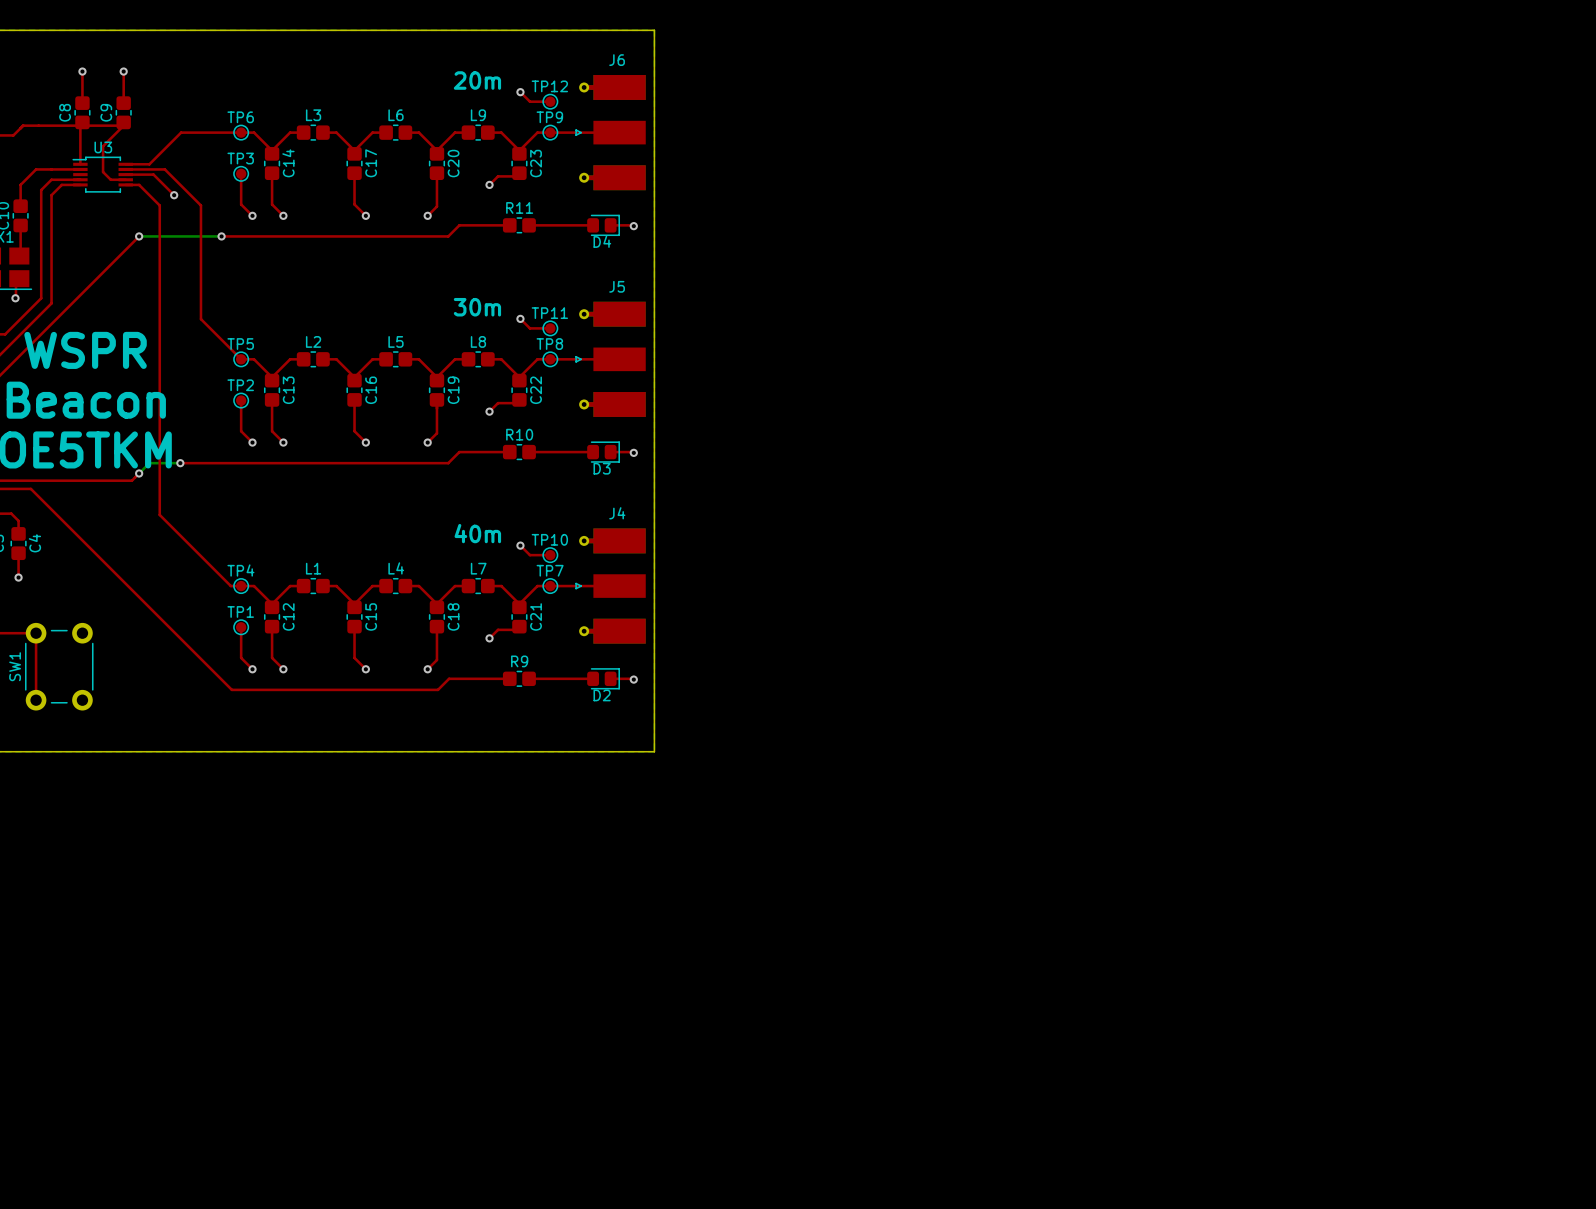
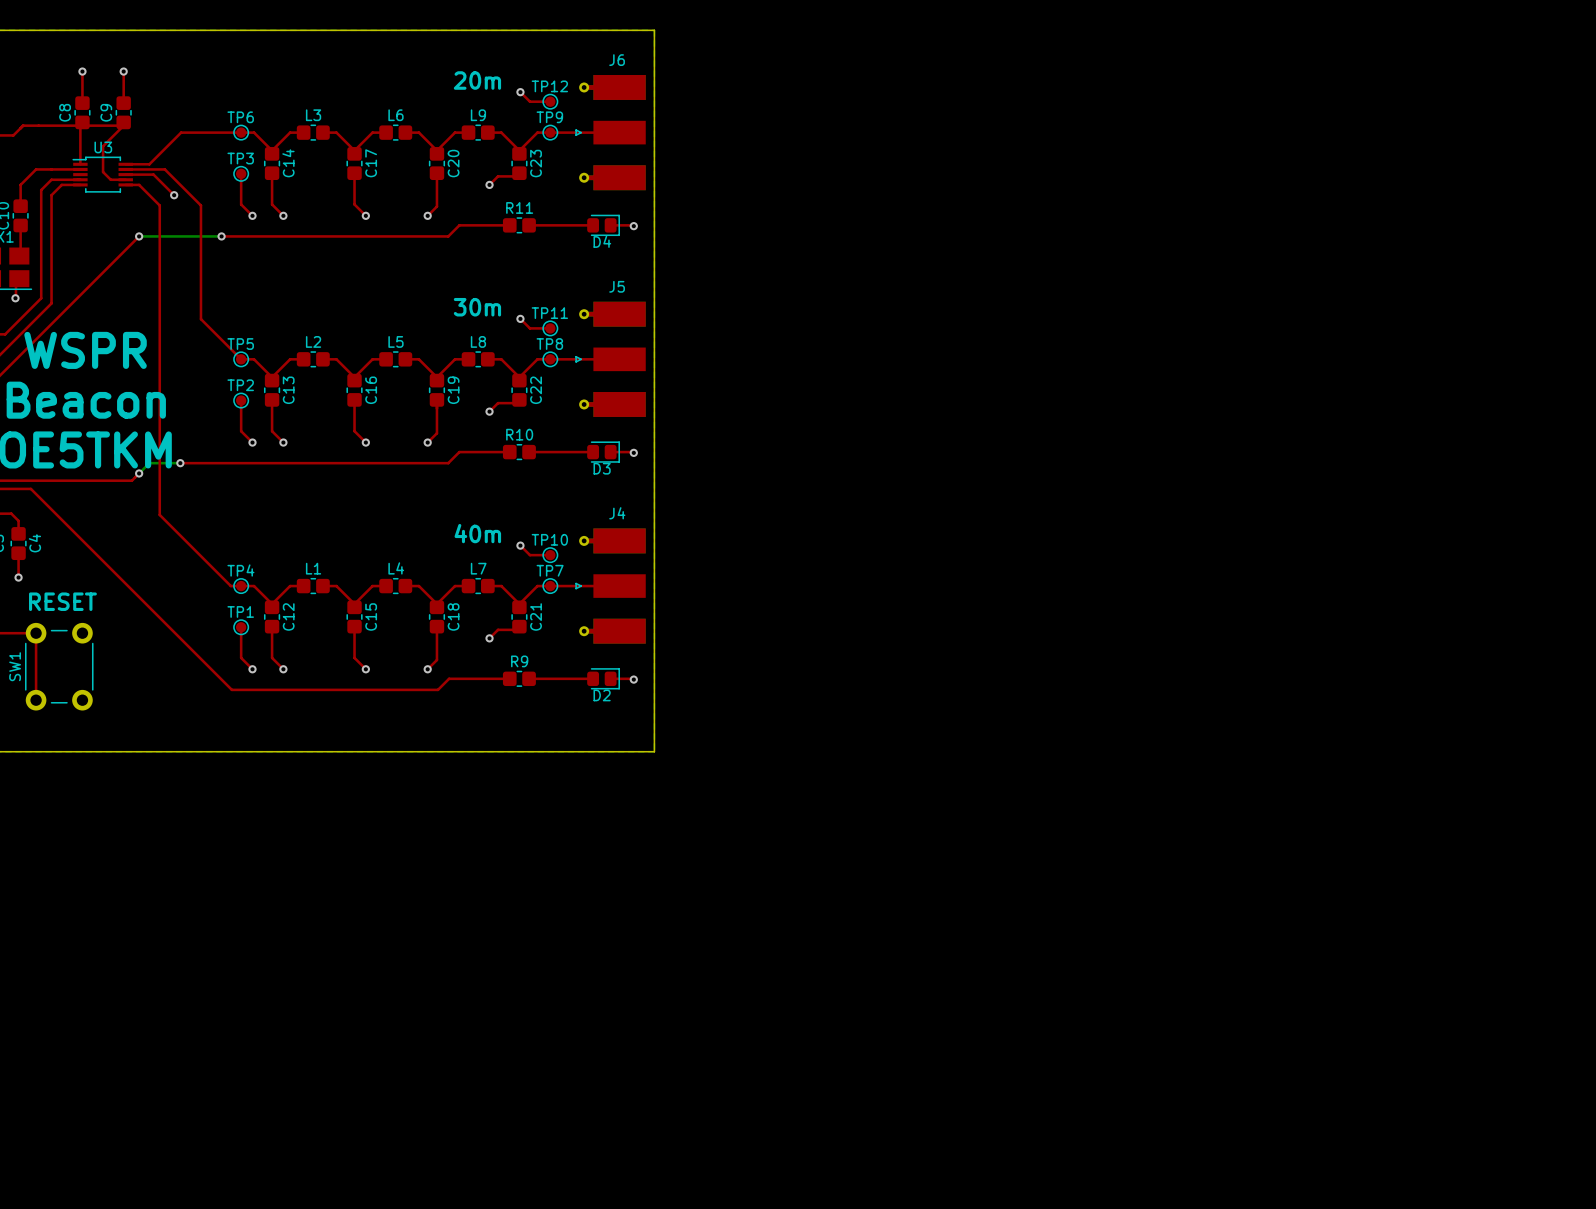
text: none -> RESET (62, 601)

